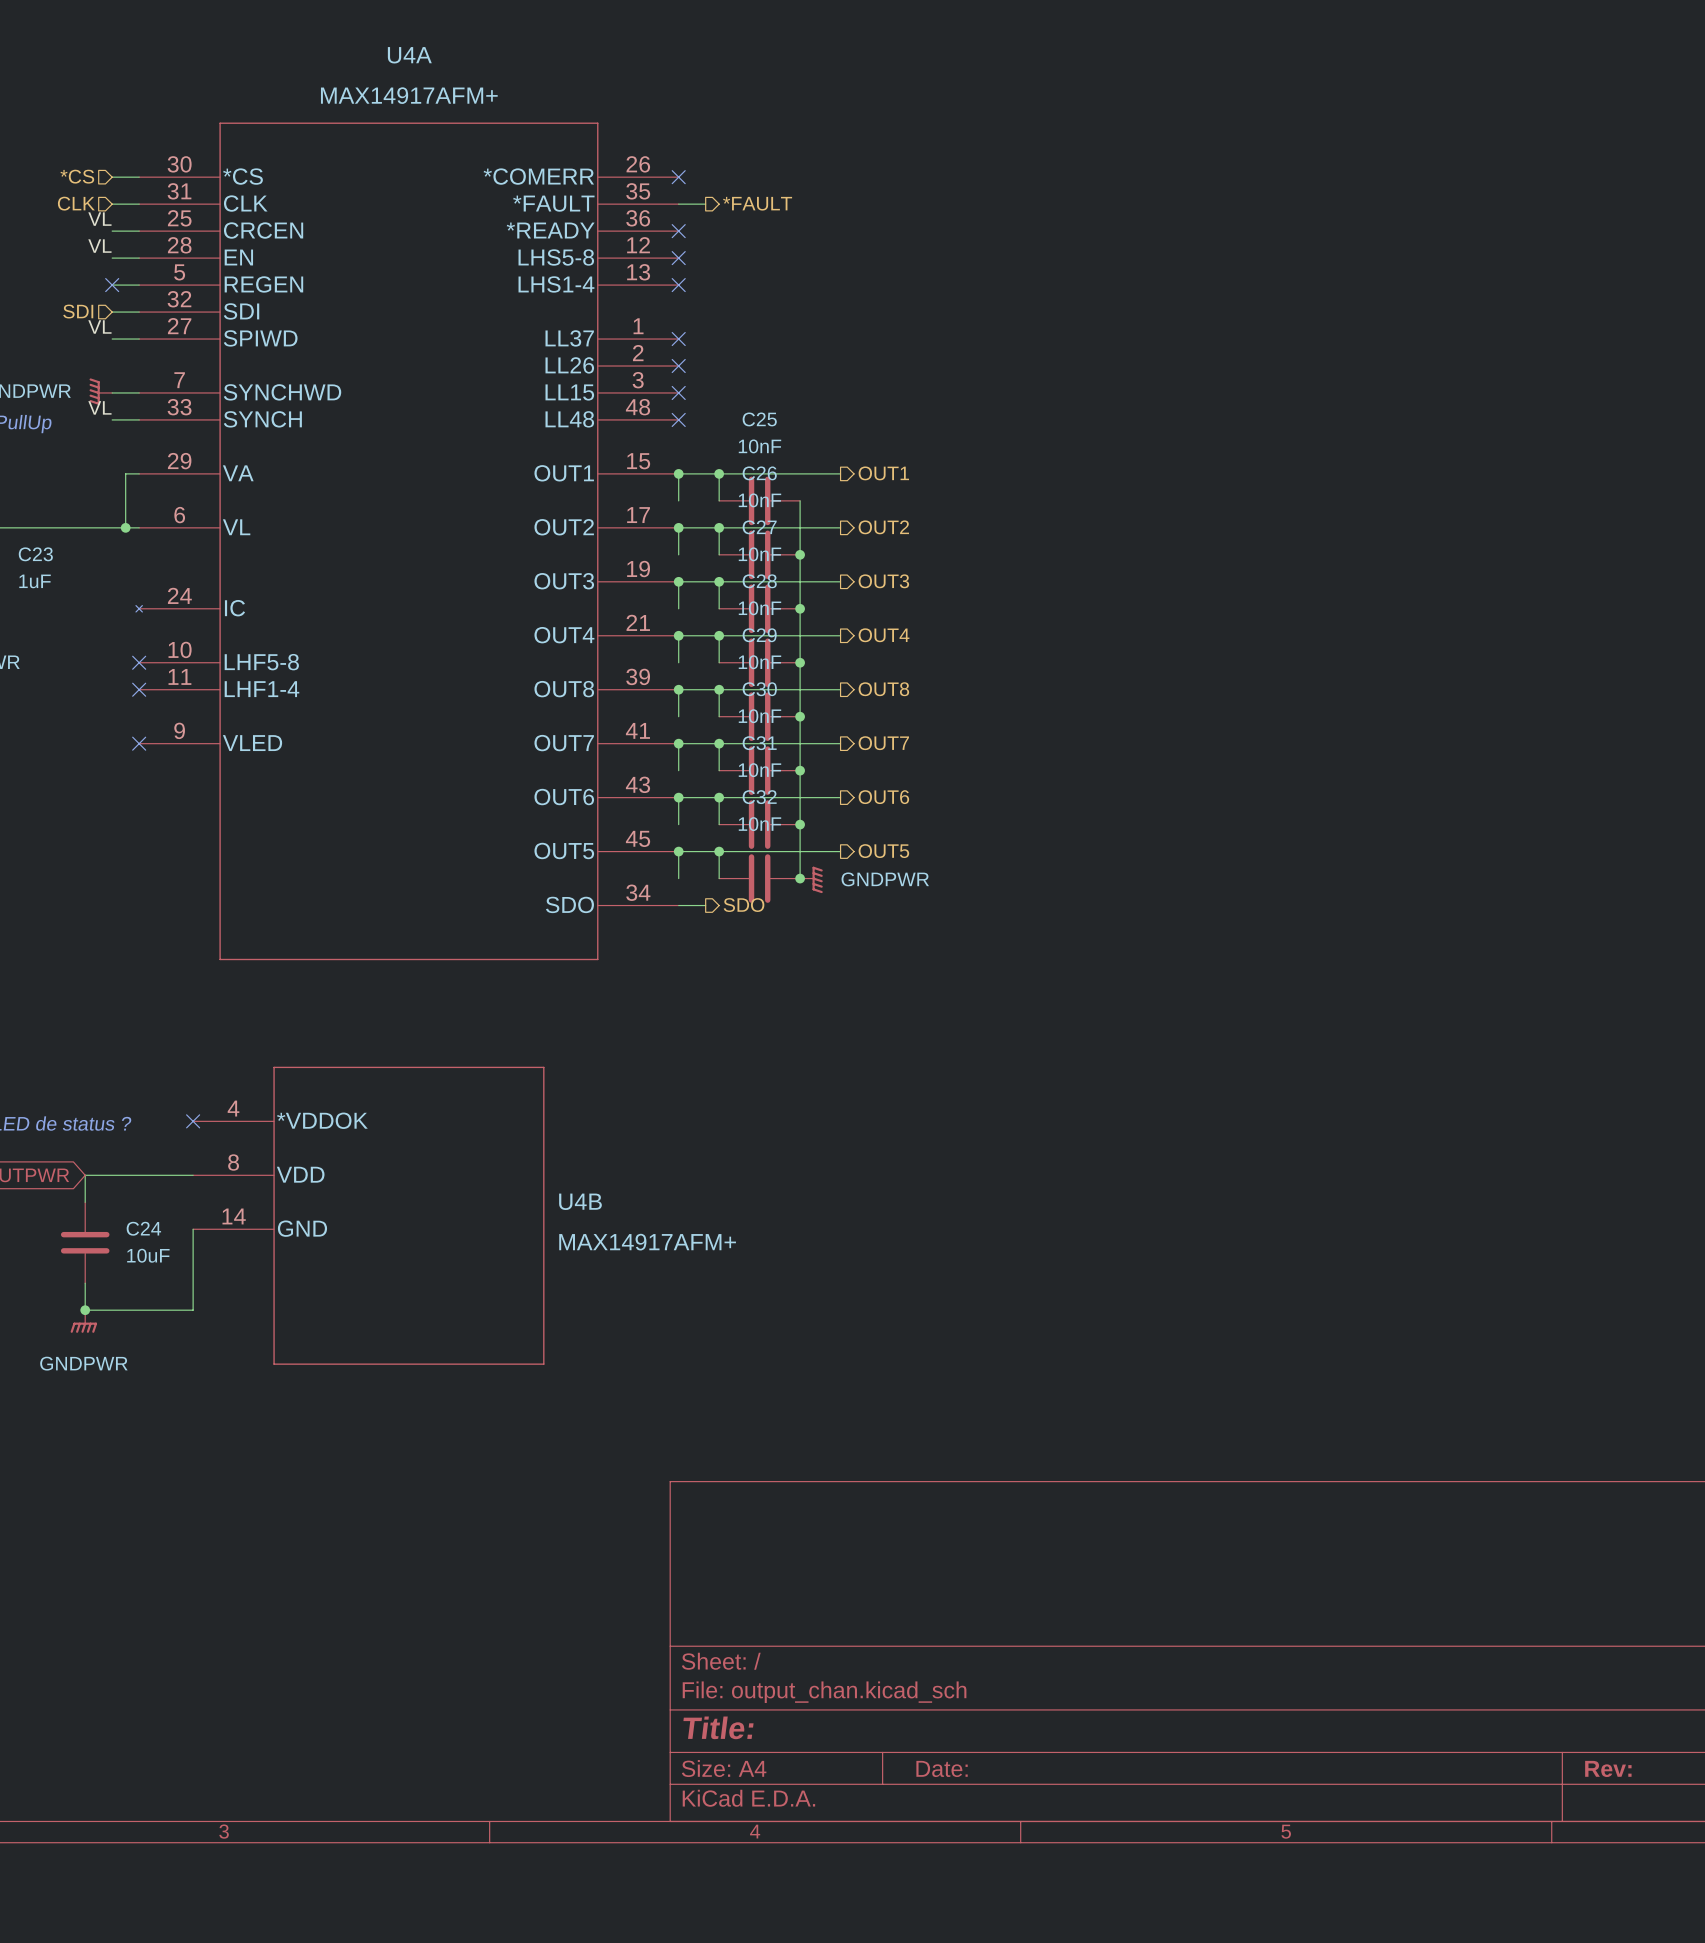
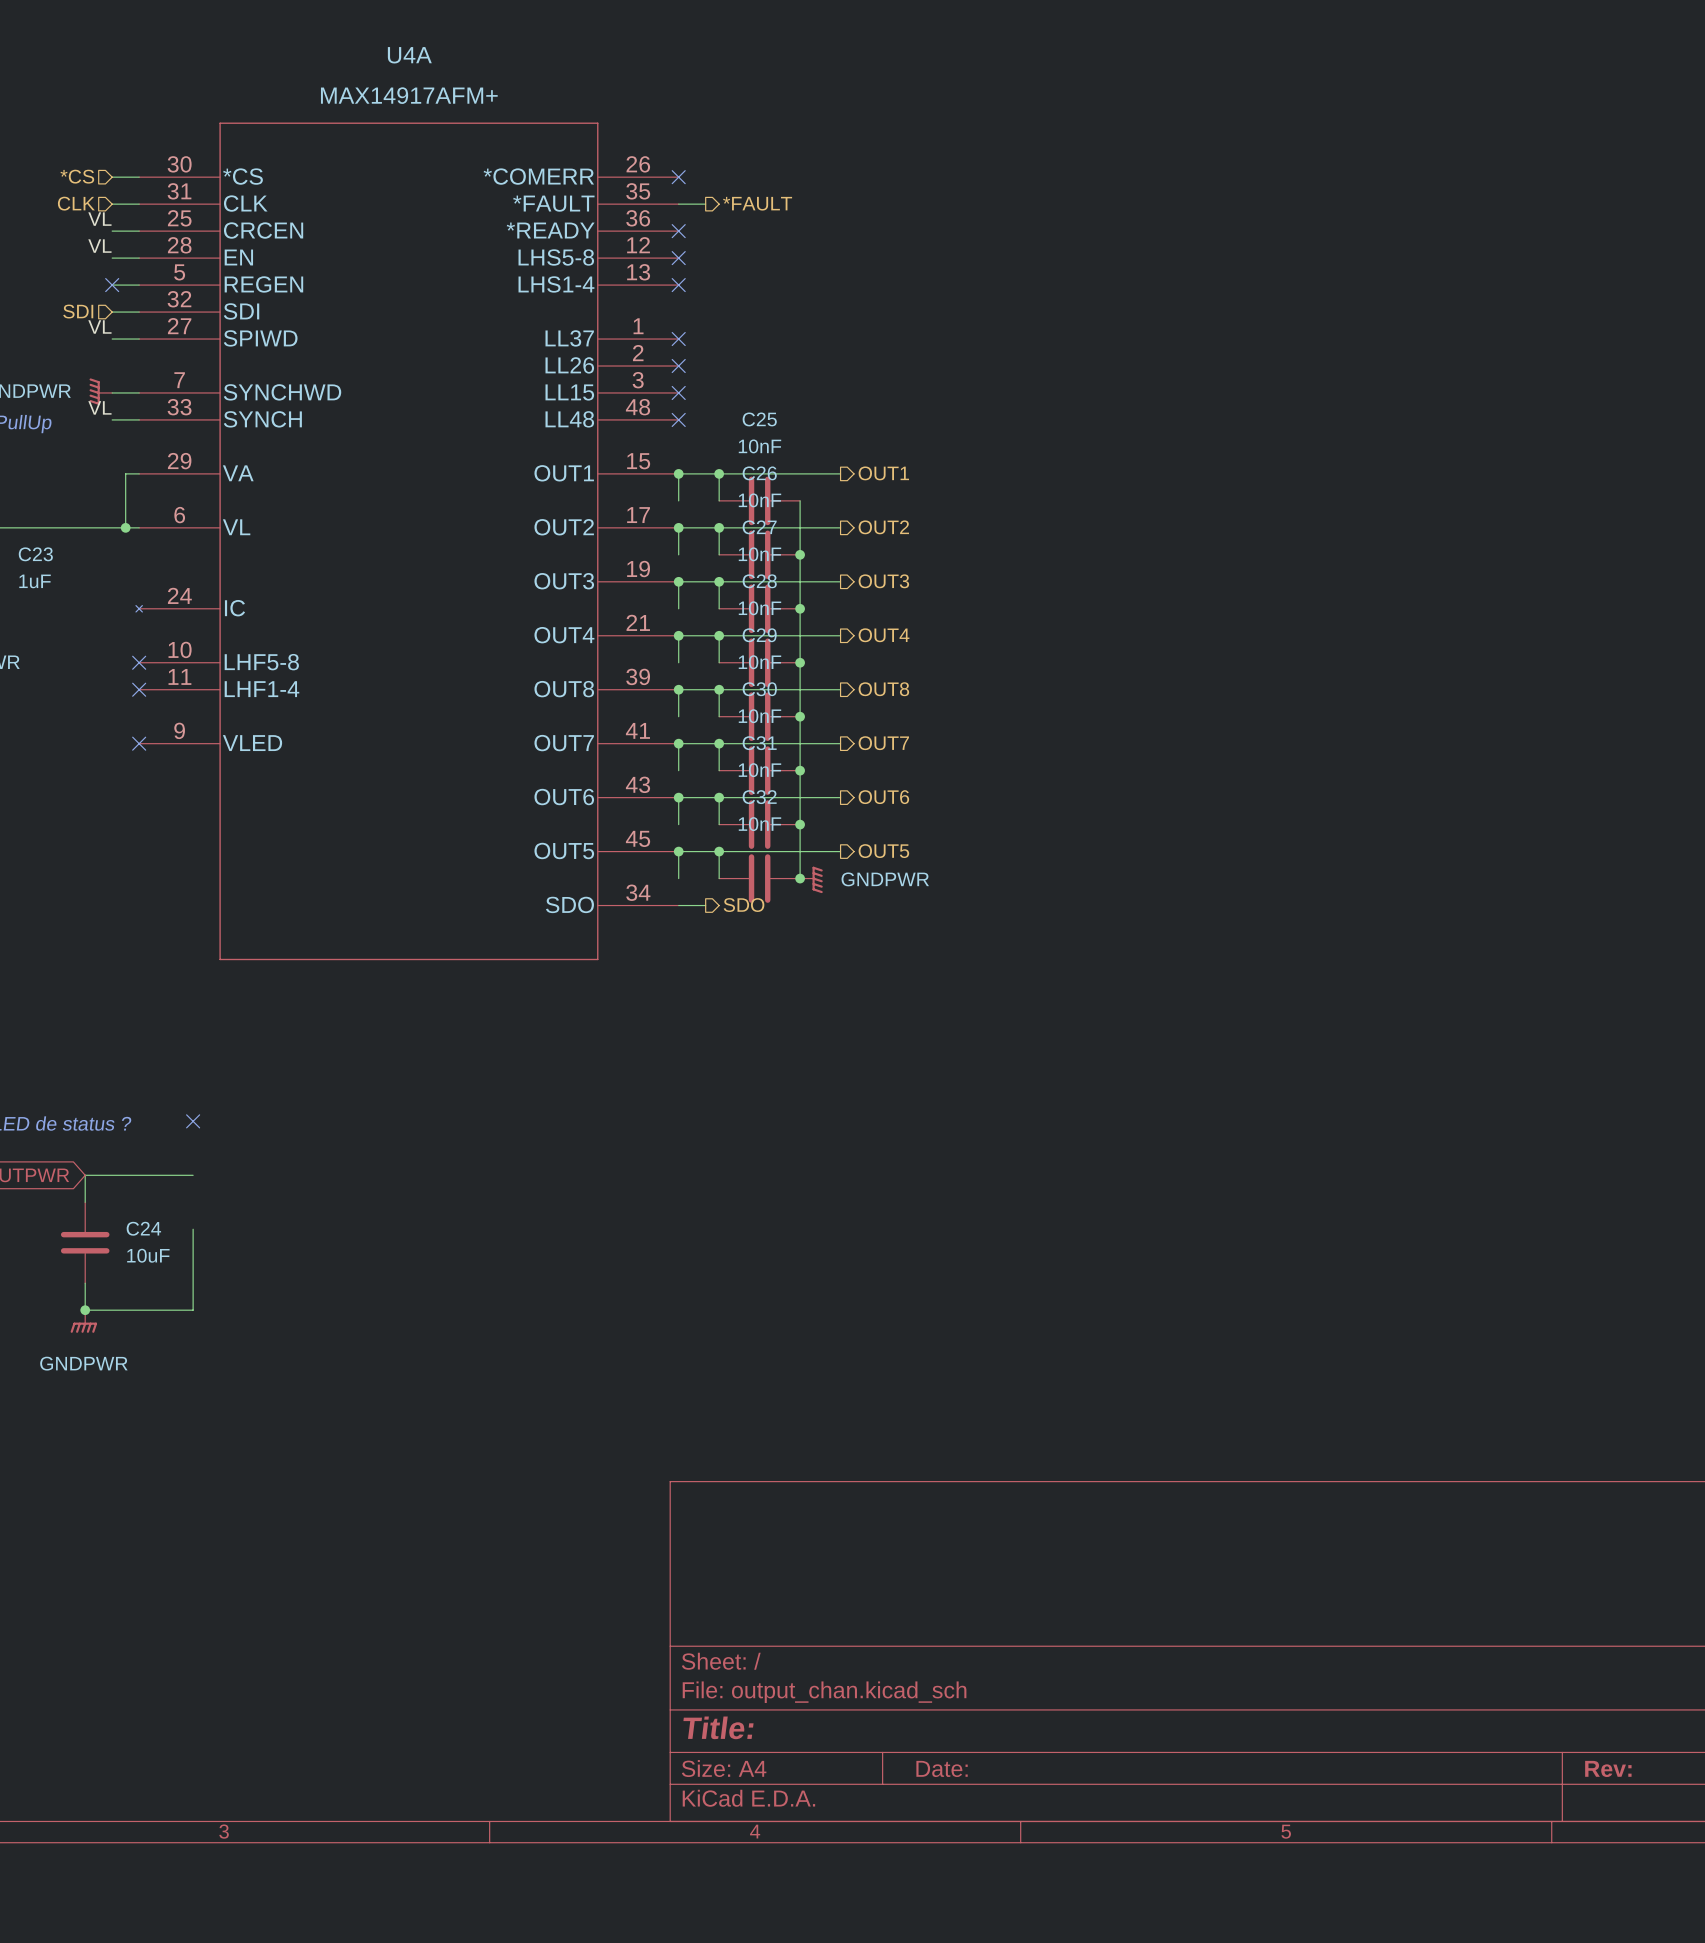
U4B: MAX14917AFM+ (368, 1215) -> none

